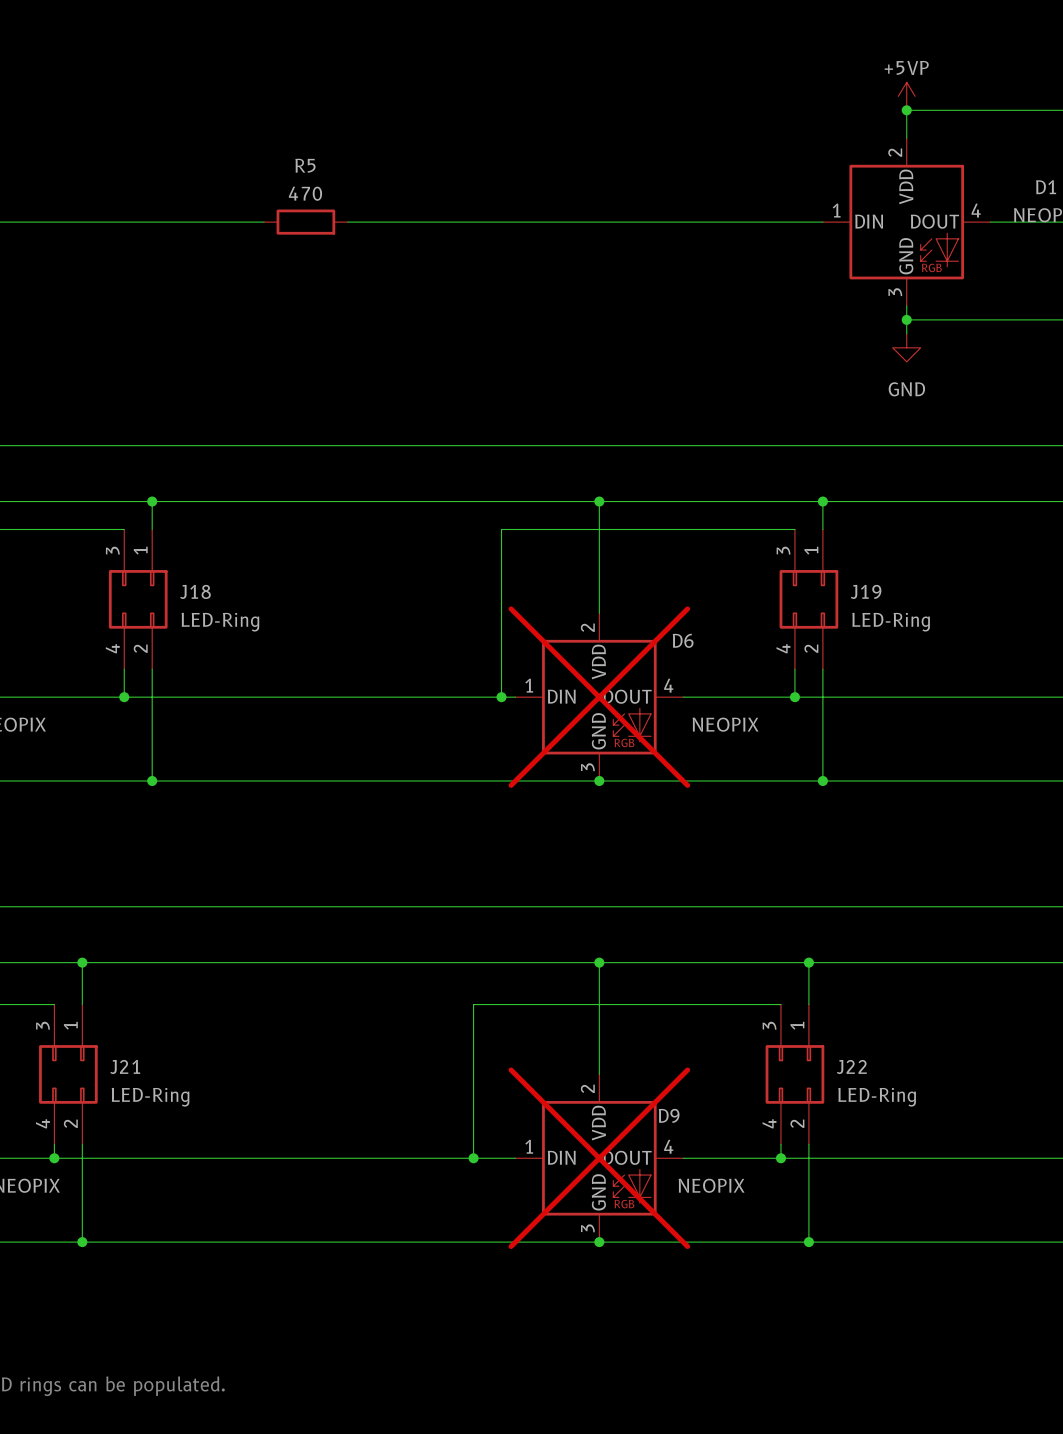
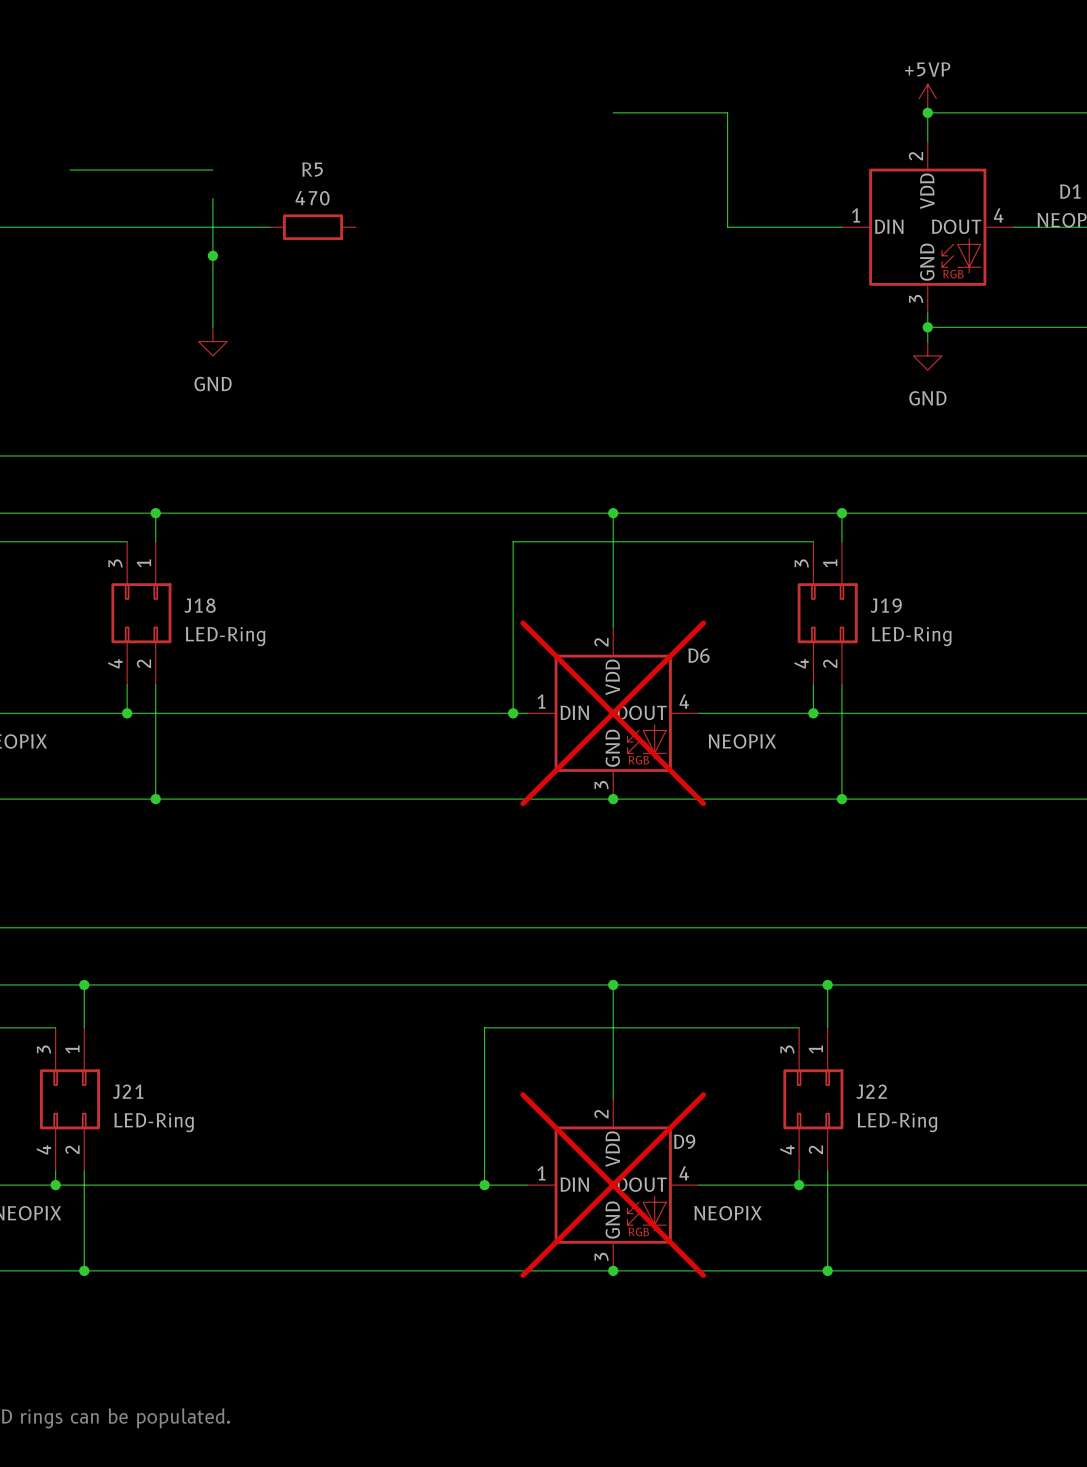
wire: none -> (69, 170) (212, 170)
wire: none -> (212, 198) (212, 327)
wire: (347, 222) (711, 222) -> (613, 112) (727, 112) (727, 227)
junction: none -> (212, 255)
power symbol: none -> GND (212, 341)

